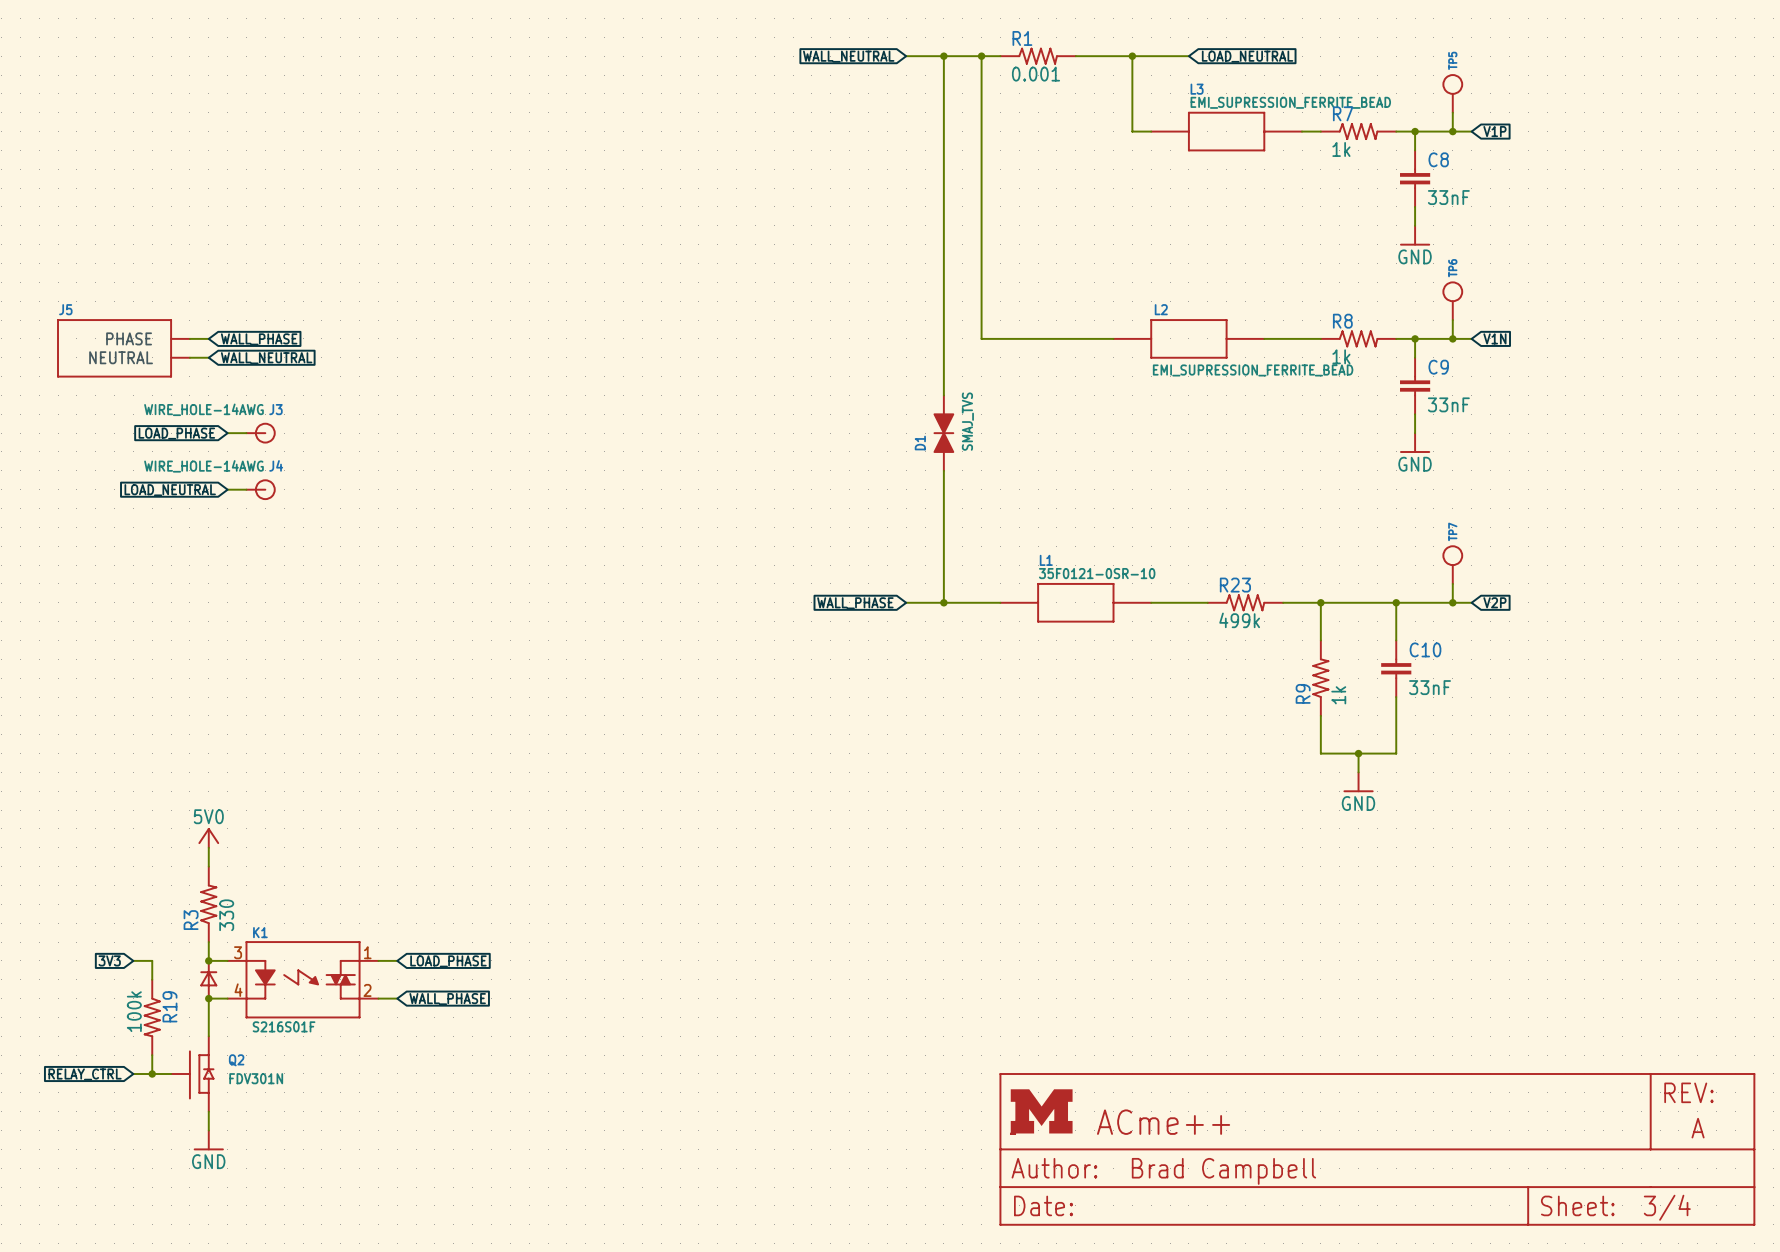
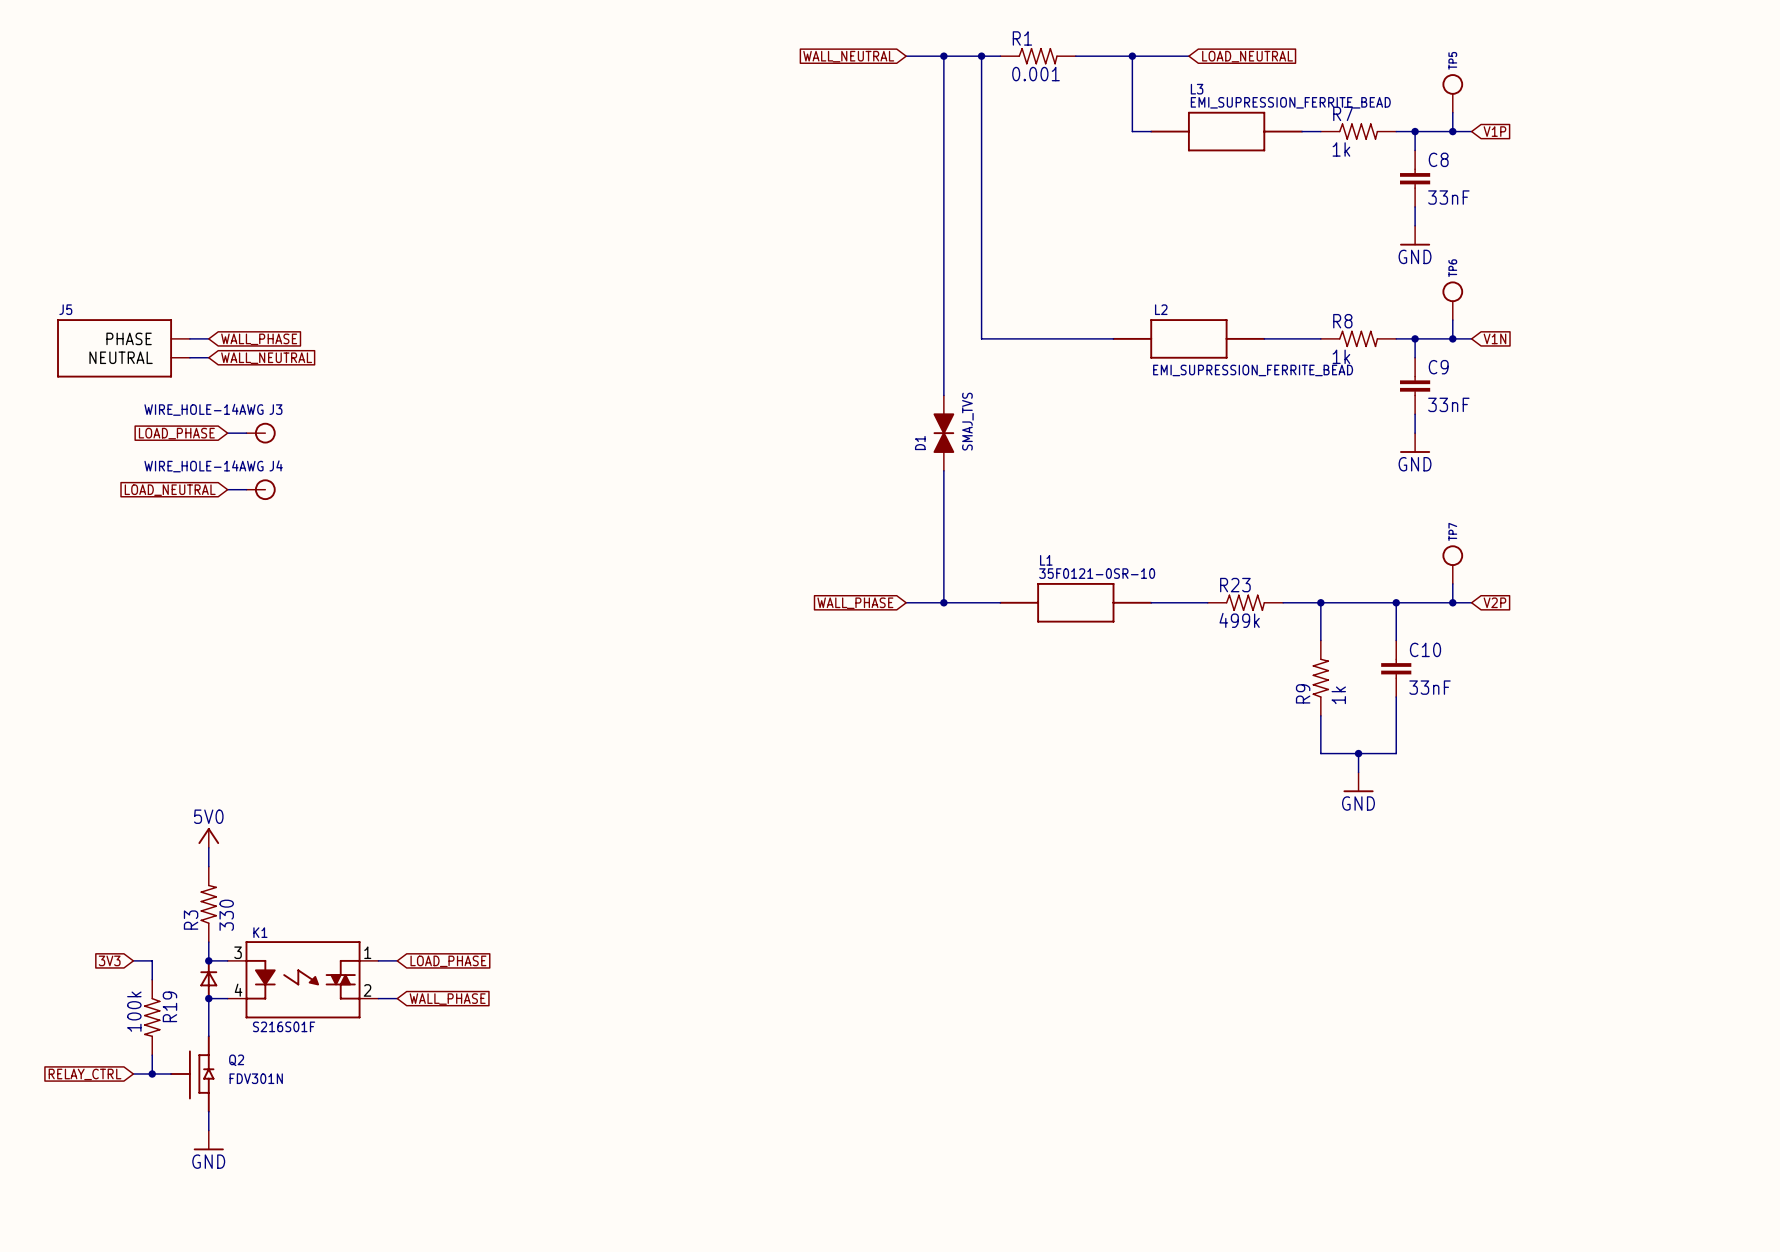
part: (1377, 1149) -> none

